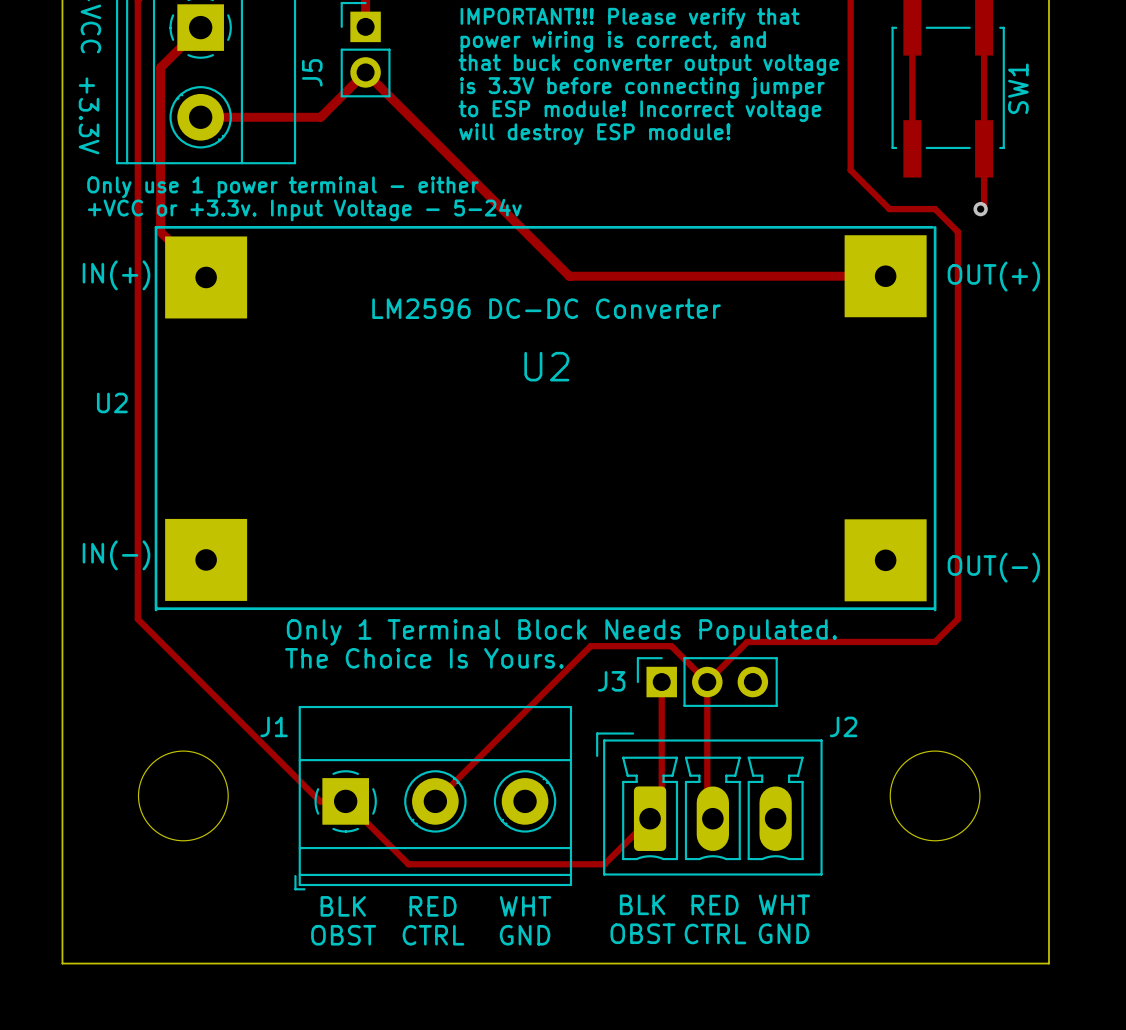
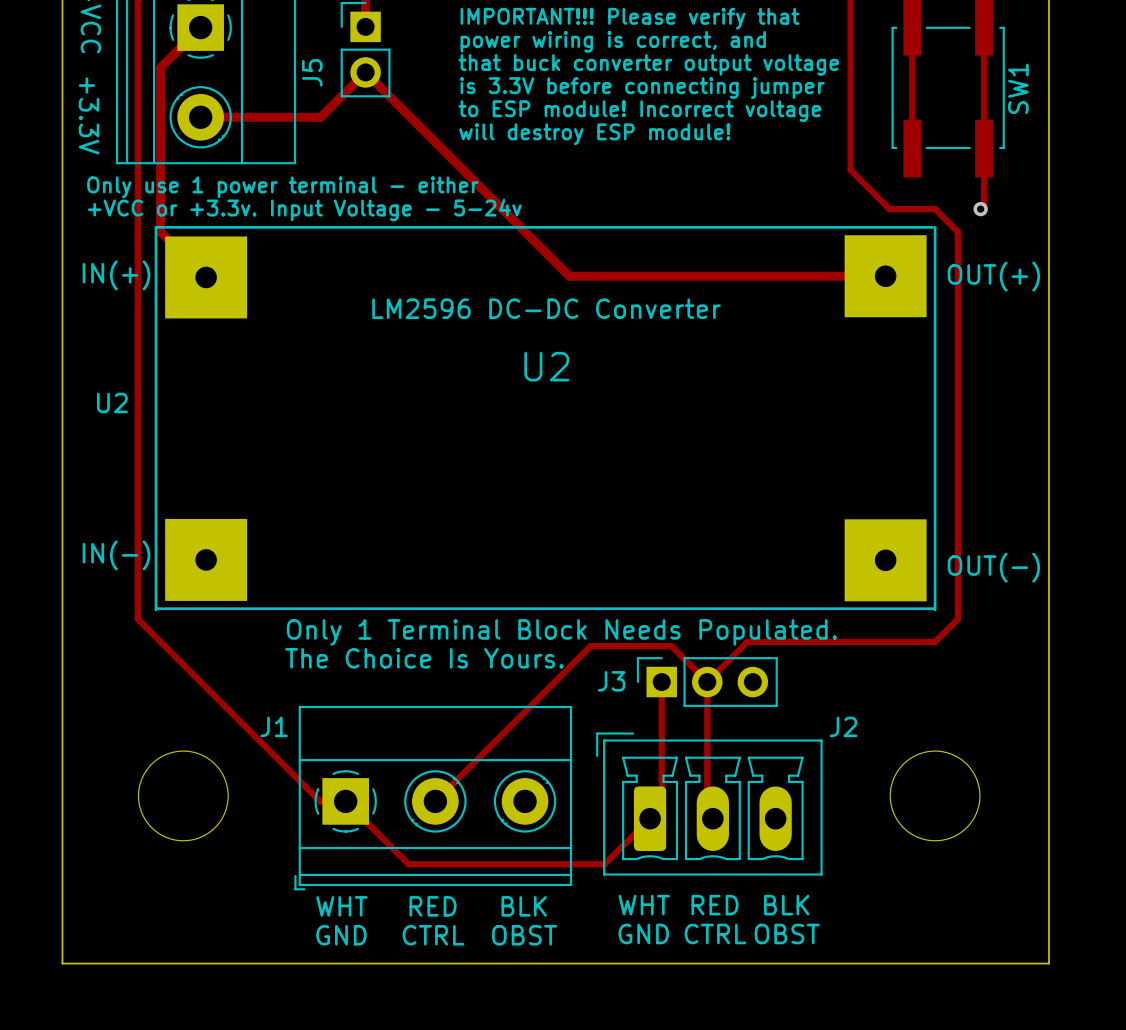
text: BLK (642, 904) -> WHT (644, 905)
text: WHT (784, 904) -> BLK (786, 905)
text: BLK (343, 906) -> WHT (341, 906)
text: WHT (525, 906) -> BLK (524, 906)
text: OBST (642, 933) -> GND (643, 933)
text: GND (783, 933) -> OBST (787, 933)
text: OBST (343, 935) -> GND (341, 935)
text: GND (525, 935) -> OBST (524, 935)

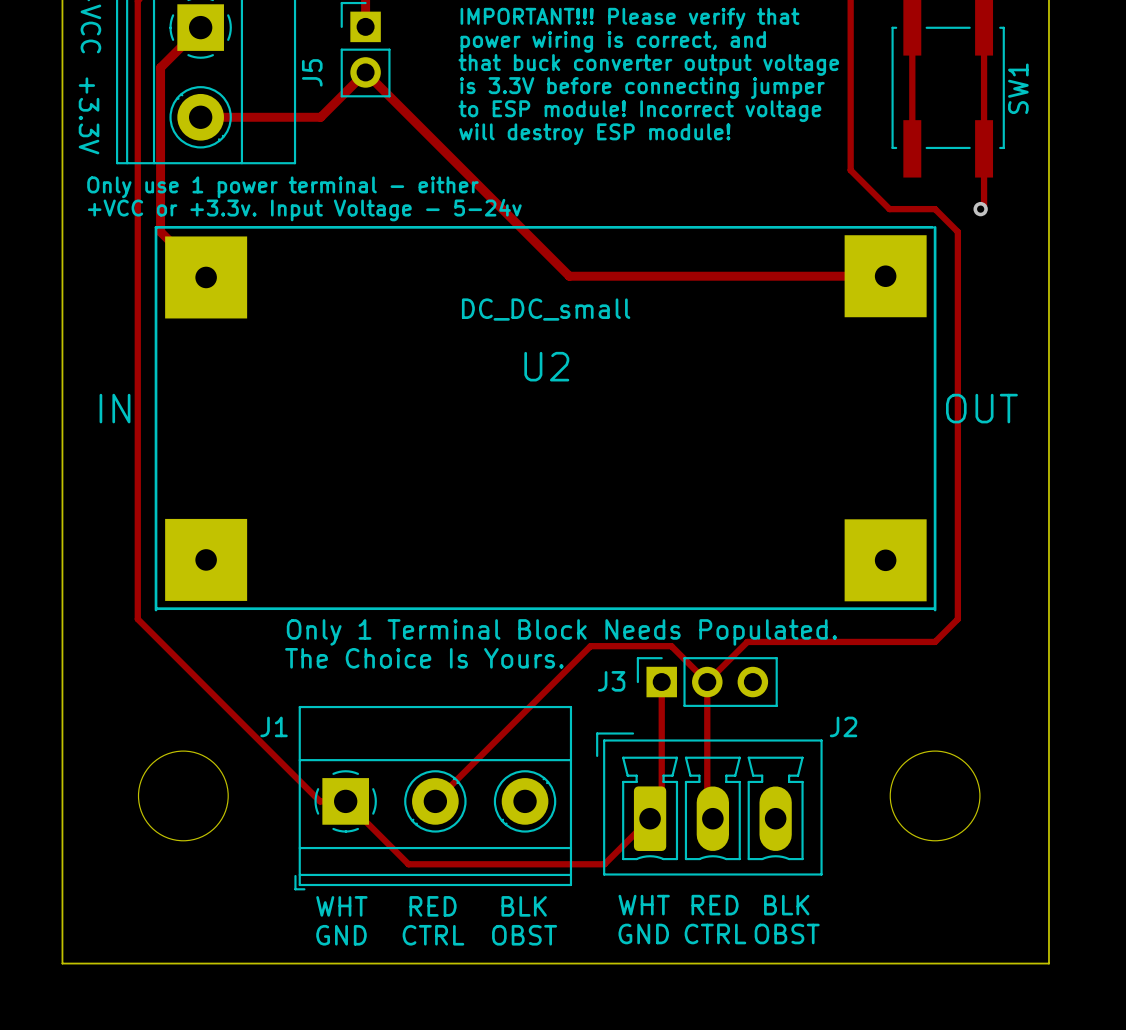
text: IN(+) (116, 275) -> none
text: OUT(+) (993, 276) -> none
U2 value: LM2596 DC-DC Converter (546, 308) -> DC_DC_small (546, 309)
text: U2 (112, 402) -> none
U2 text: none -> IN (115, 408)
U2 text: none -> OUT (981, 408)
text: IN(-) (116, 555) -> none
text: OUT(-) (993, 567) -> none

